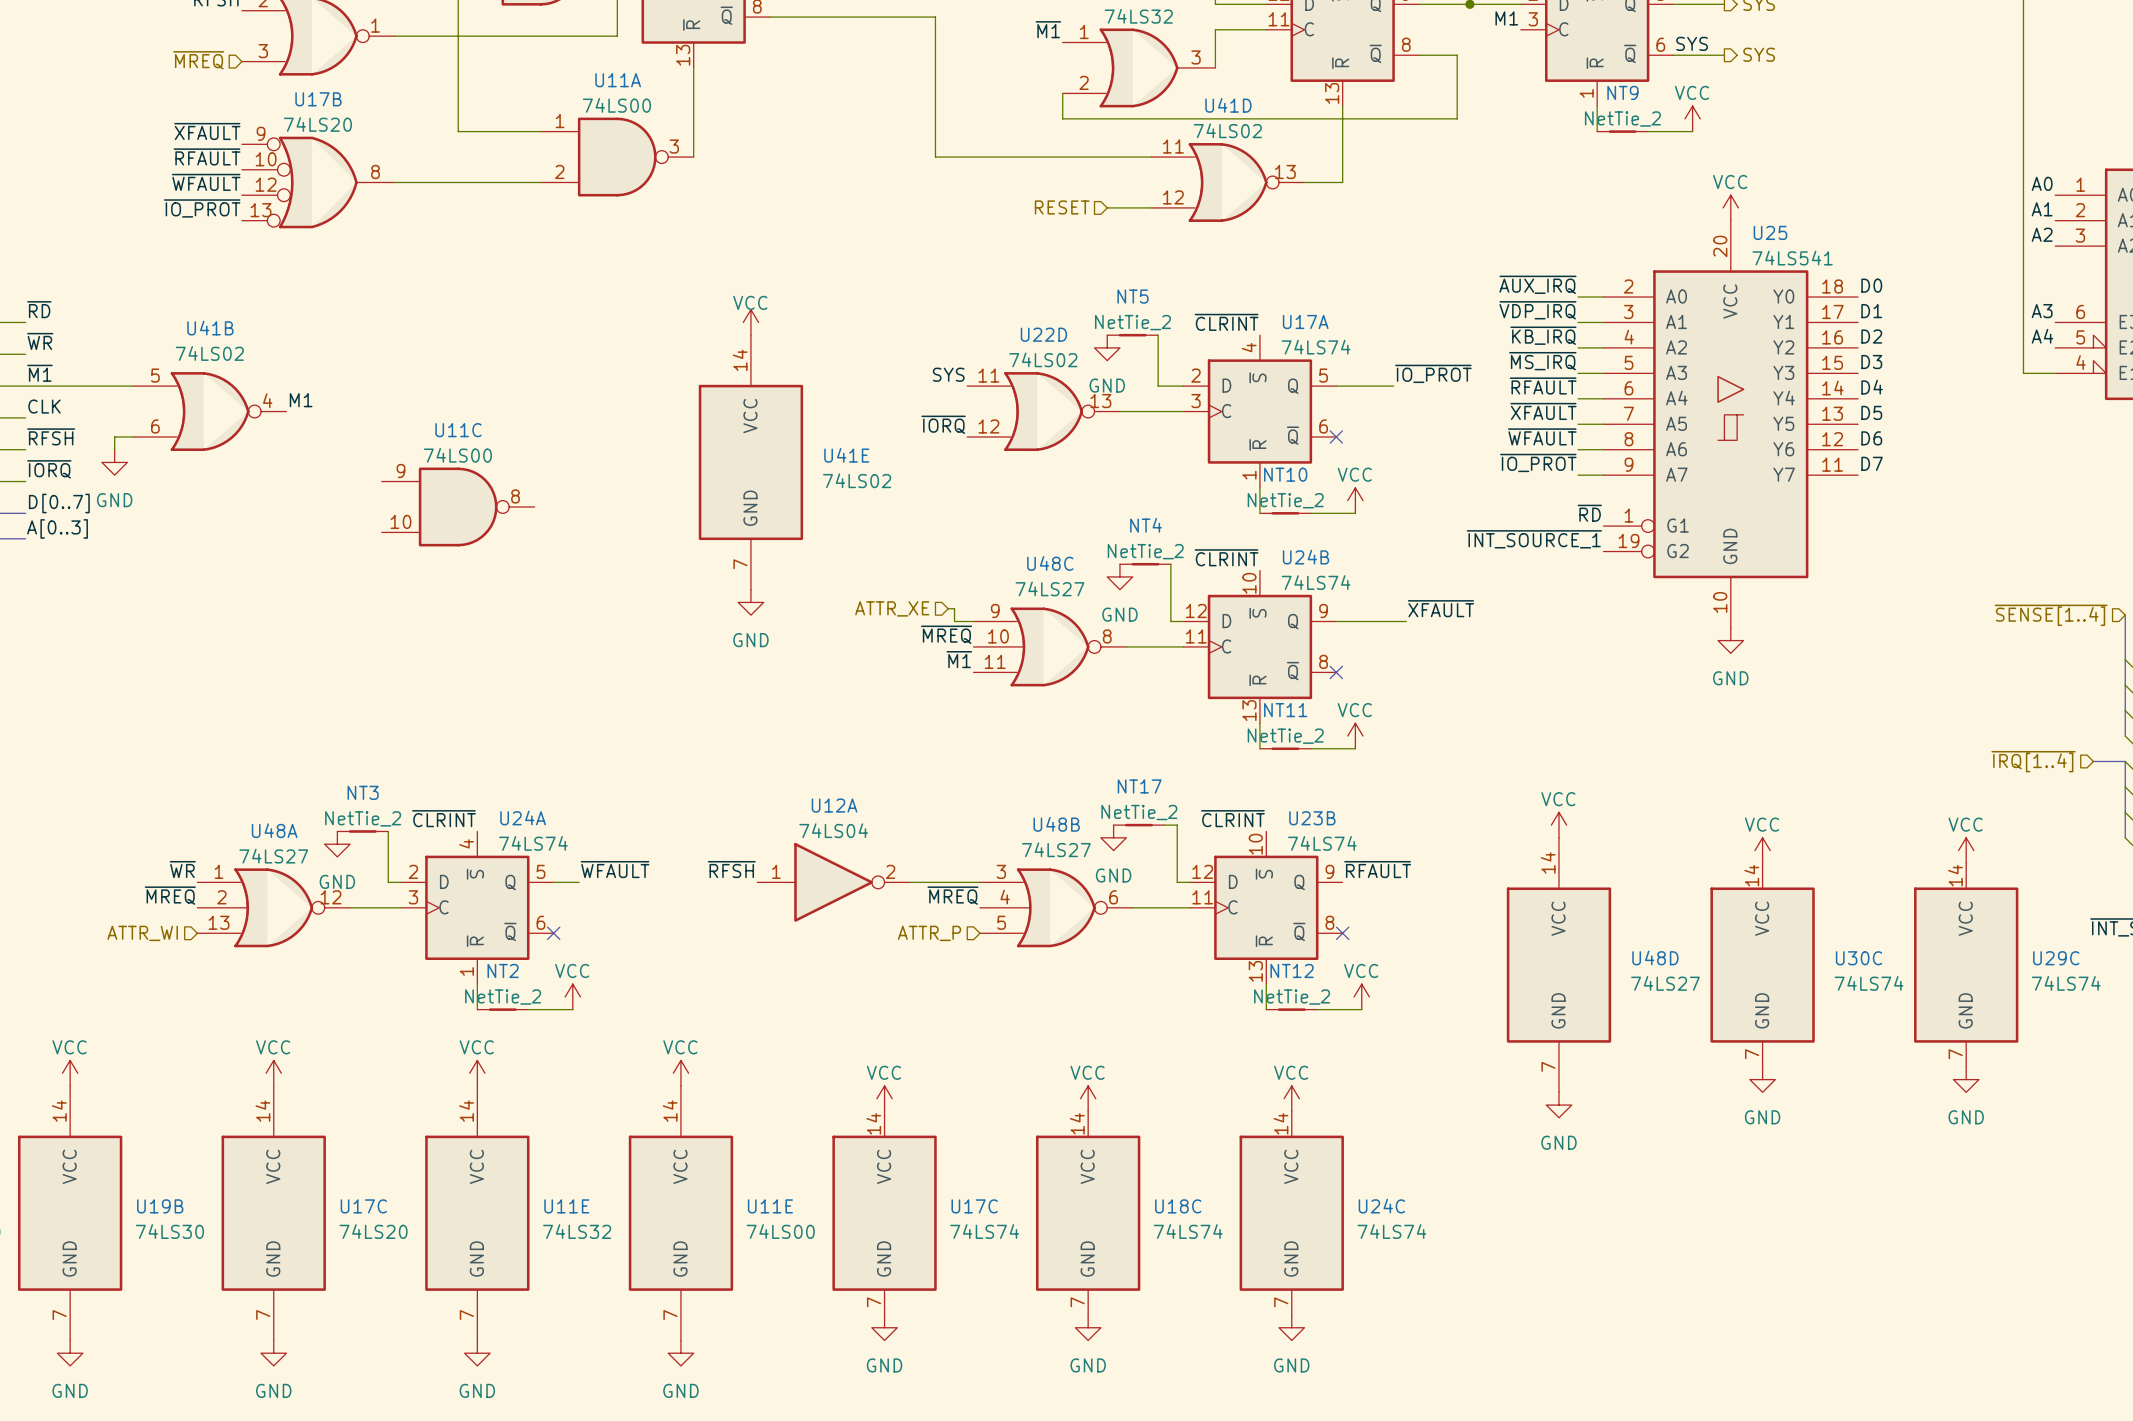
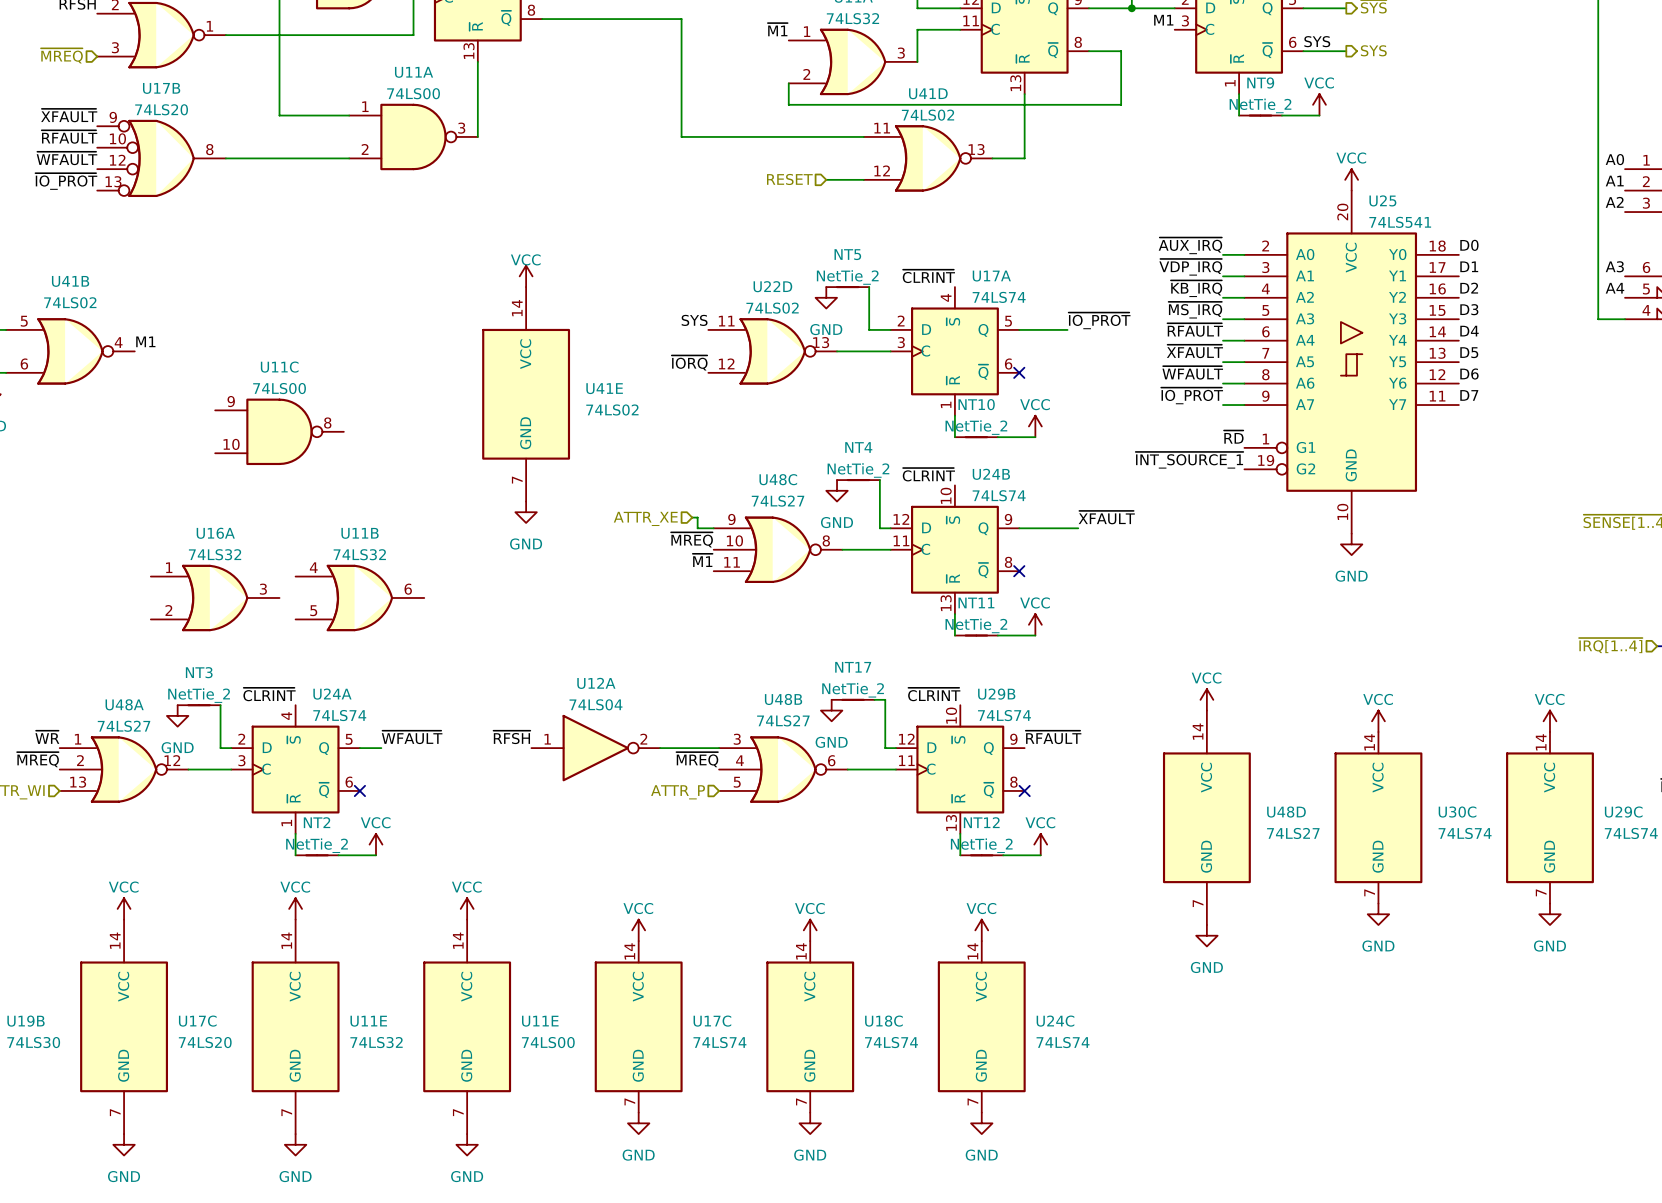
U16A: none -> 74LS32 (215, 597)
U11B: none -> 74LS32 (359, 597)
U23B name: U23B (1312, 818) -> U29B (996, 694)

